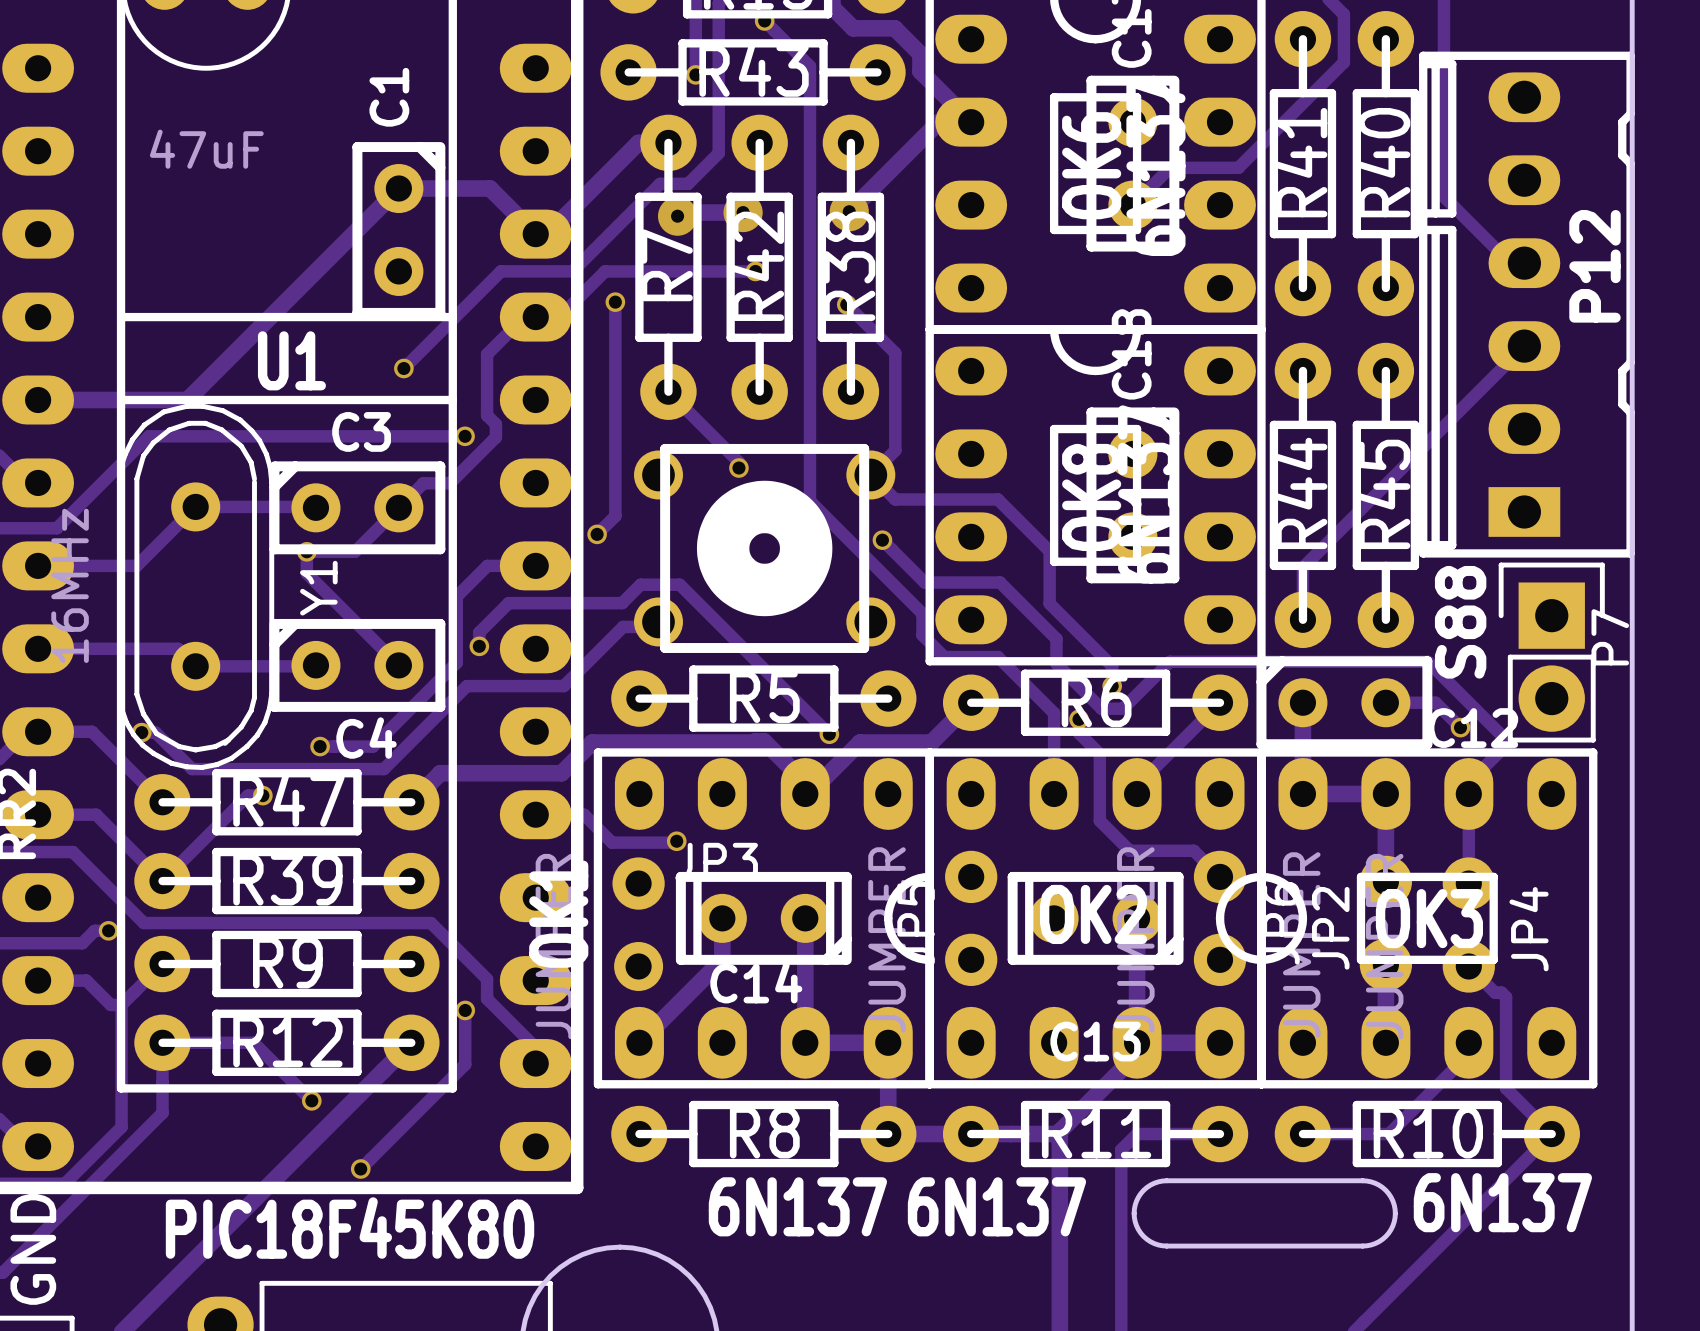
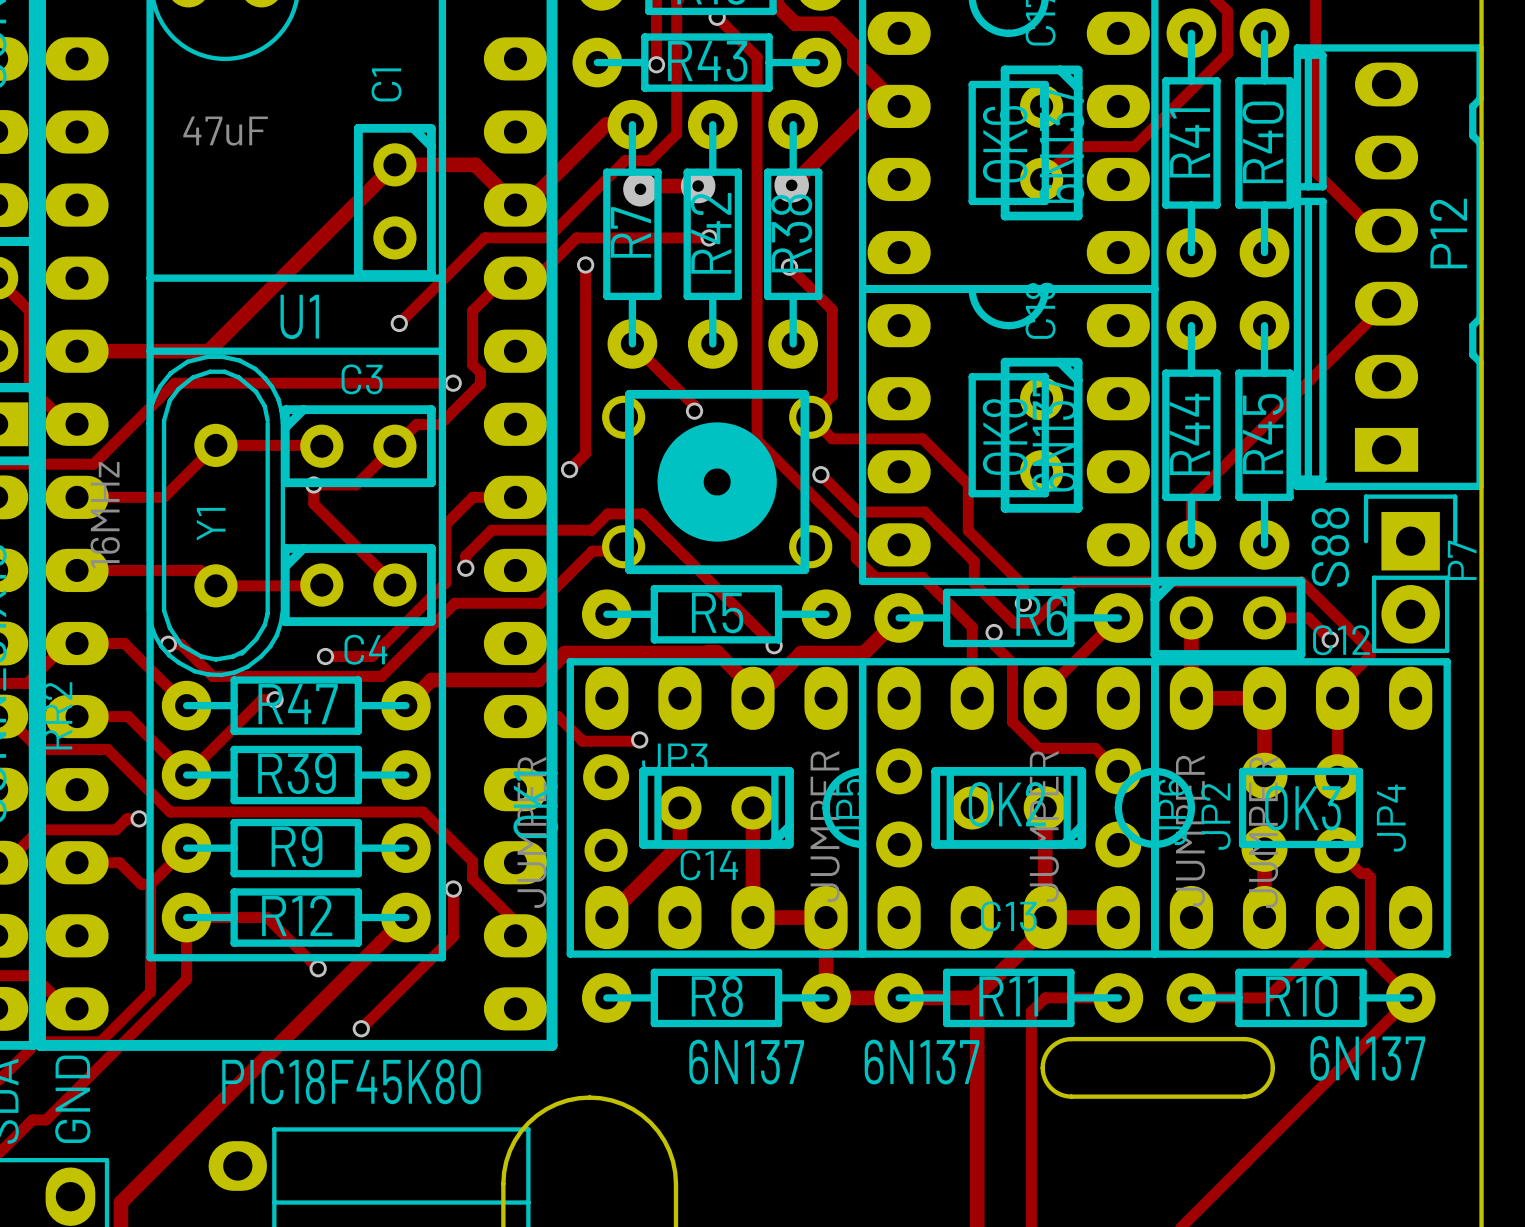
Y1 name position: Y1 (318, 588) -> Y1 (211, 524)
R6 name position: R6 (1096, 701) -> R6 (1042, 615)

